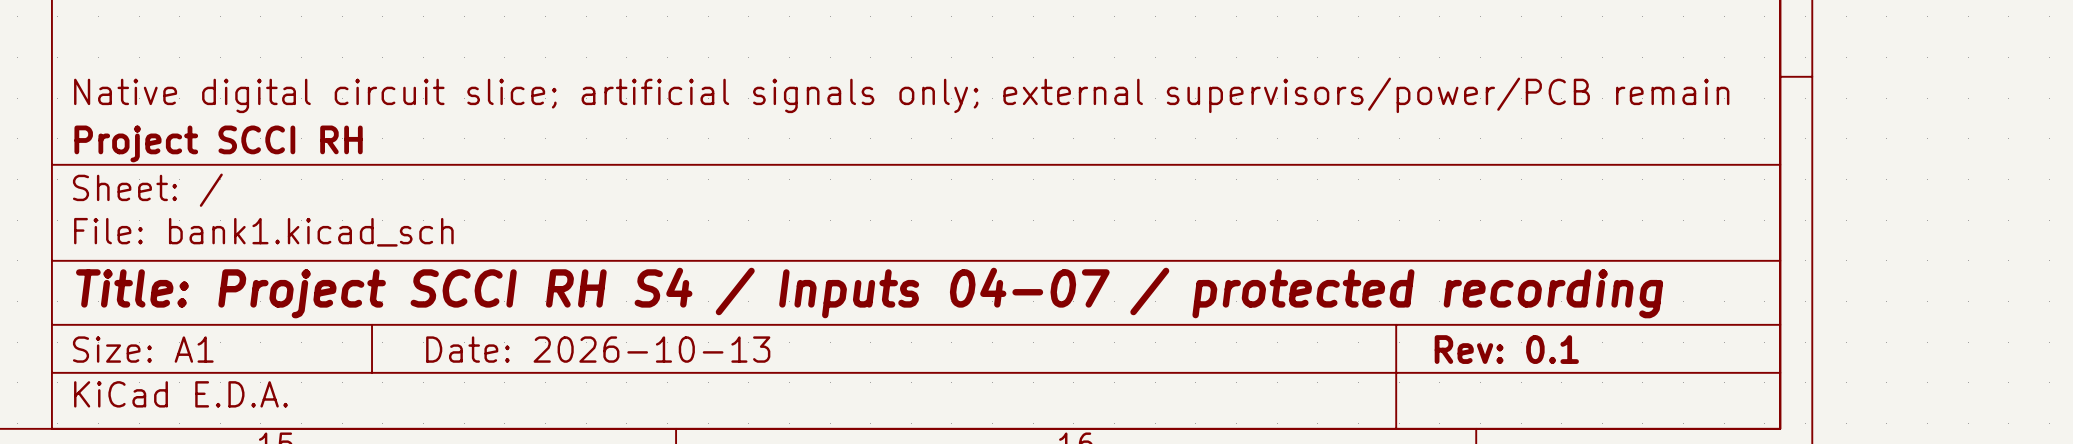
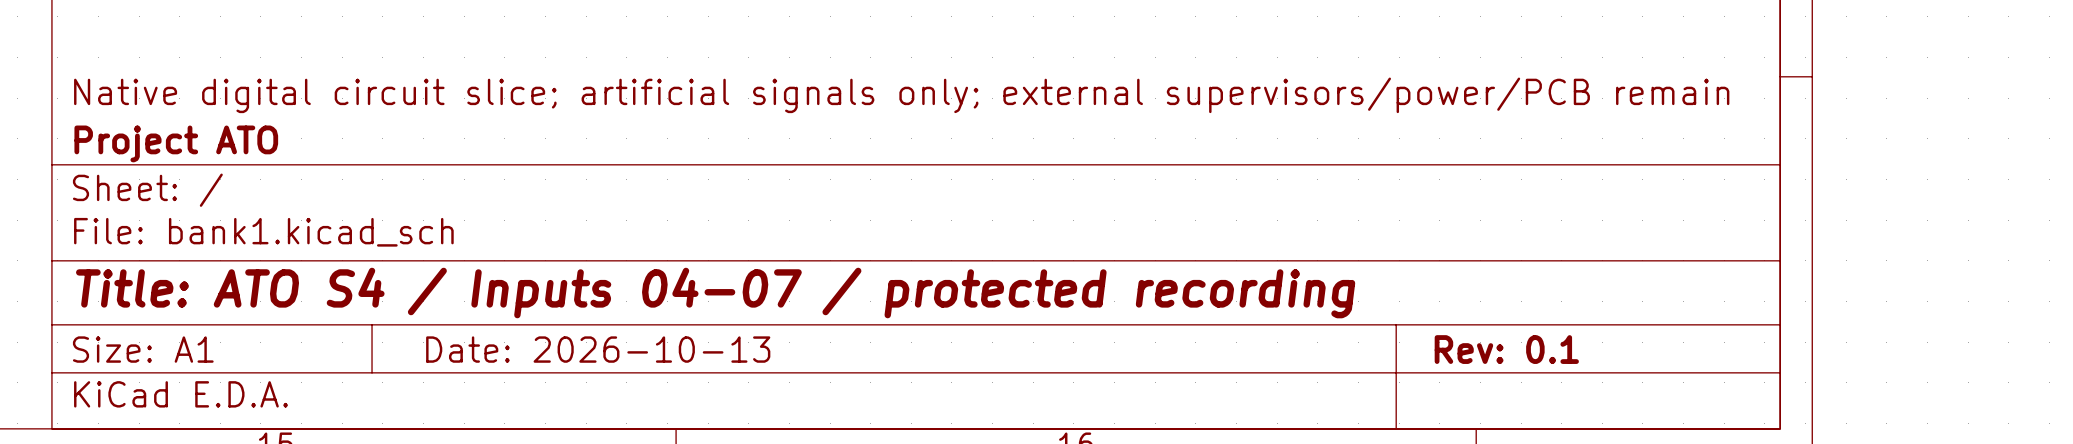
title block: Project SCCI RH (218, 143) -> Project ATO (176, 143)
title block: Title: Project SCCI RH S4 / Inputs 04-07 / protected recording (869, 293) -> Title: ATO S4 / Inputs 04-07 / protected recording (715, 293)

